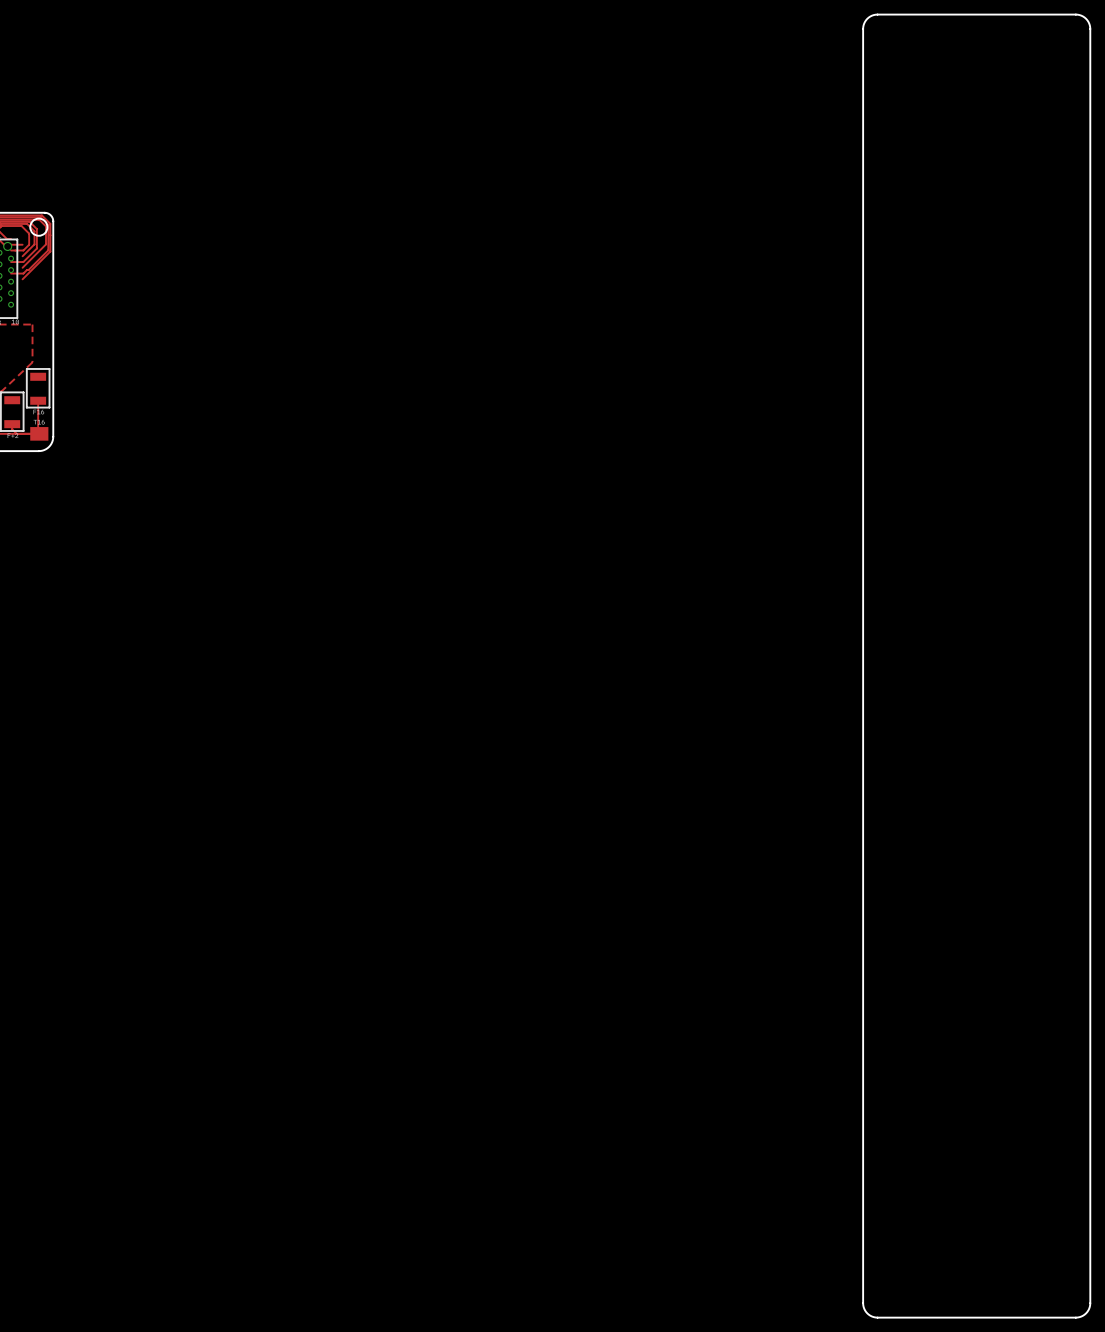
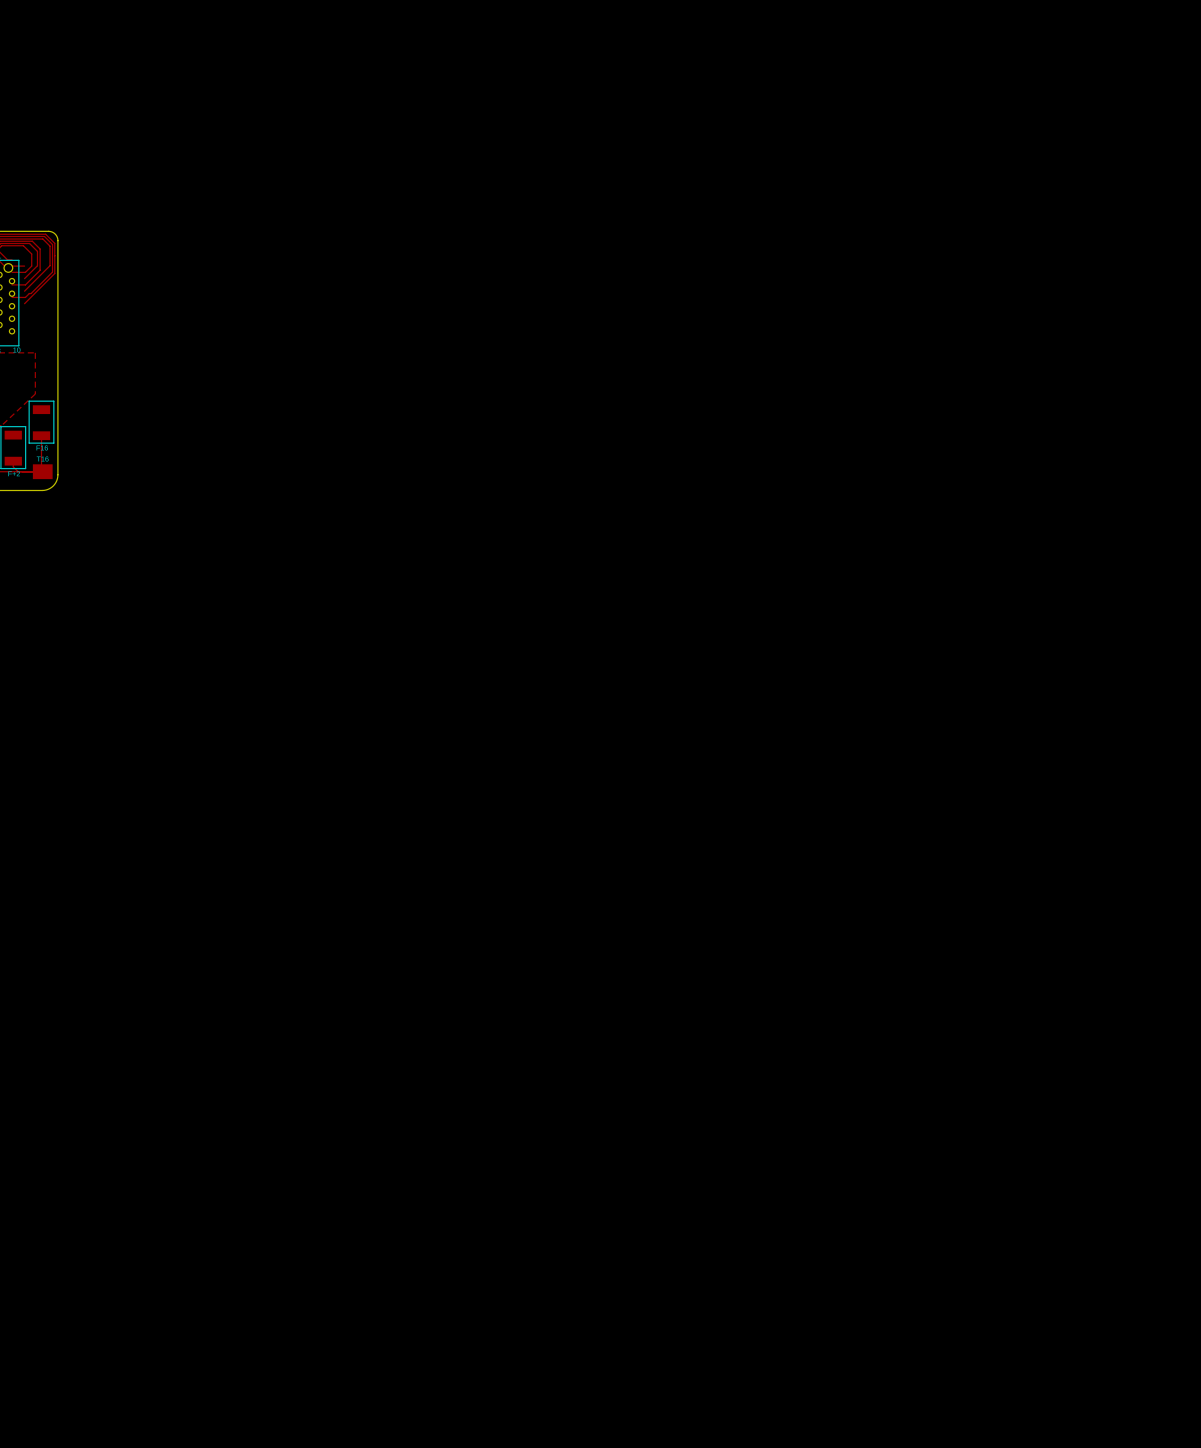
board edge: (877, 14) (1075, 14) (1084, 17) (1090, 27) (1090, 1303) (1087, 1311) (1077, 1317) (877, 1317) (868, 1314) (863, 1305) (863, 28) (867, 18) (877, 14) -> none
round board edge: [29, 218, 48, 237] -> none

